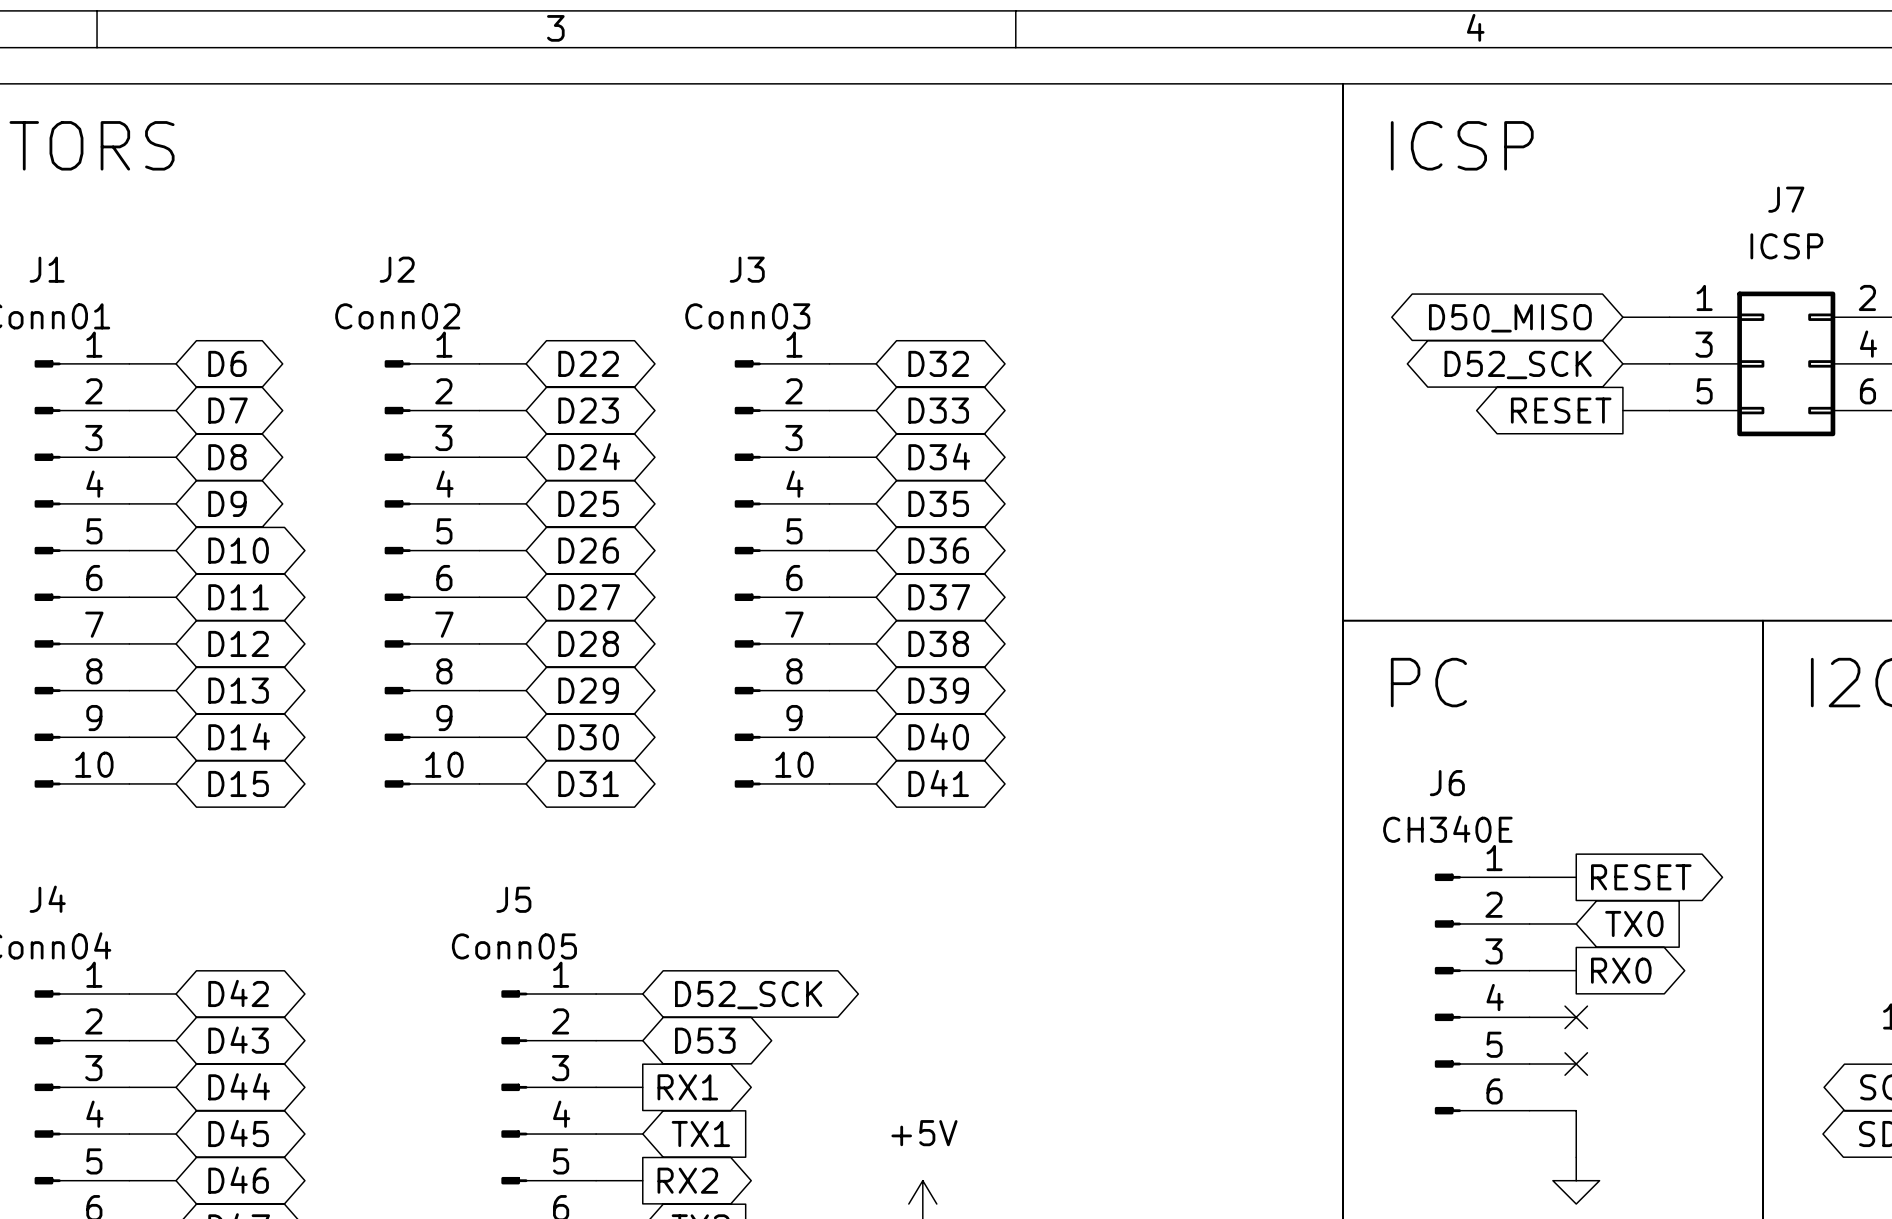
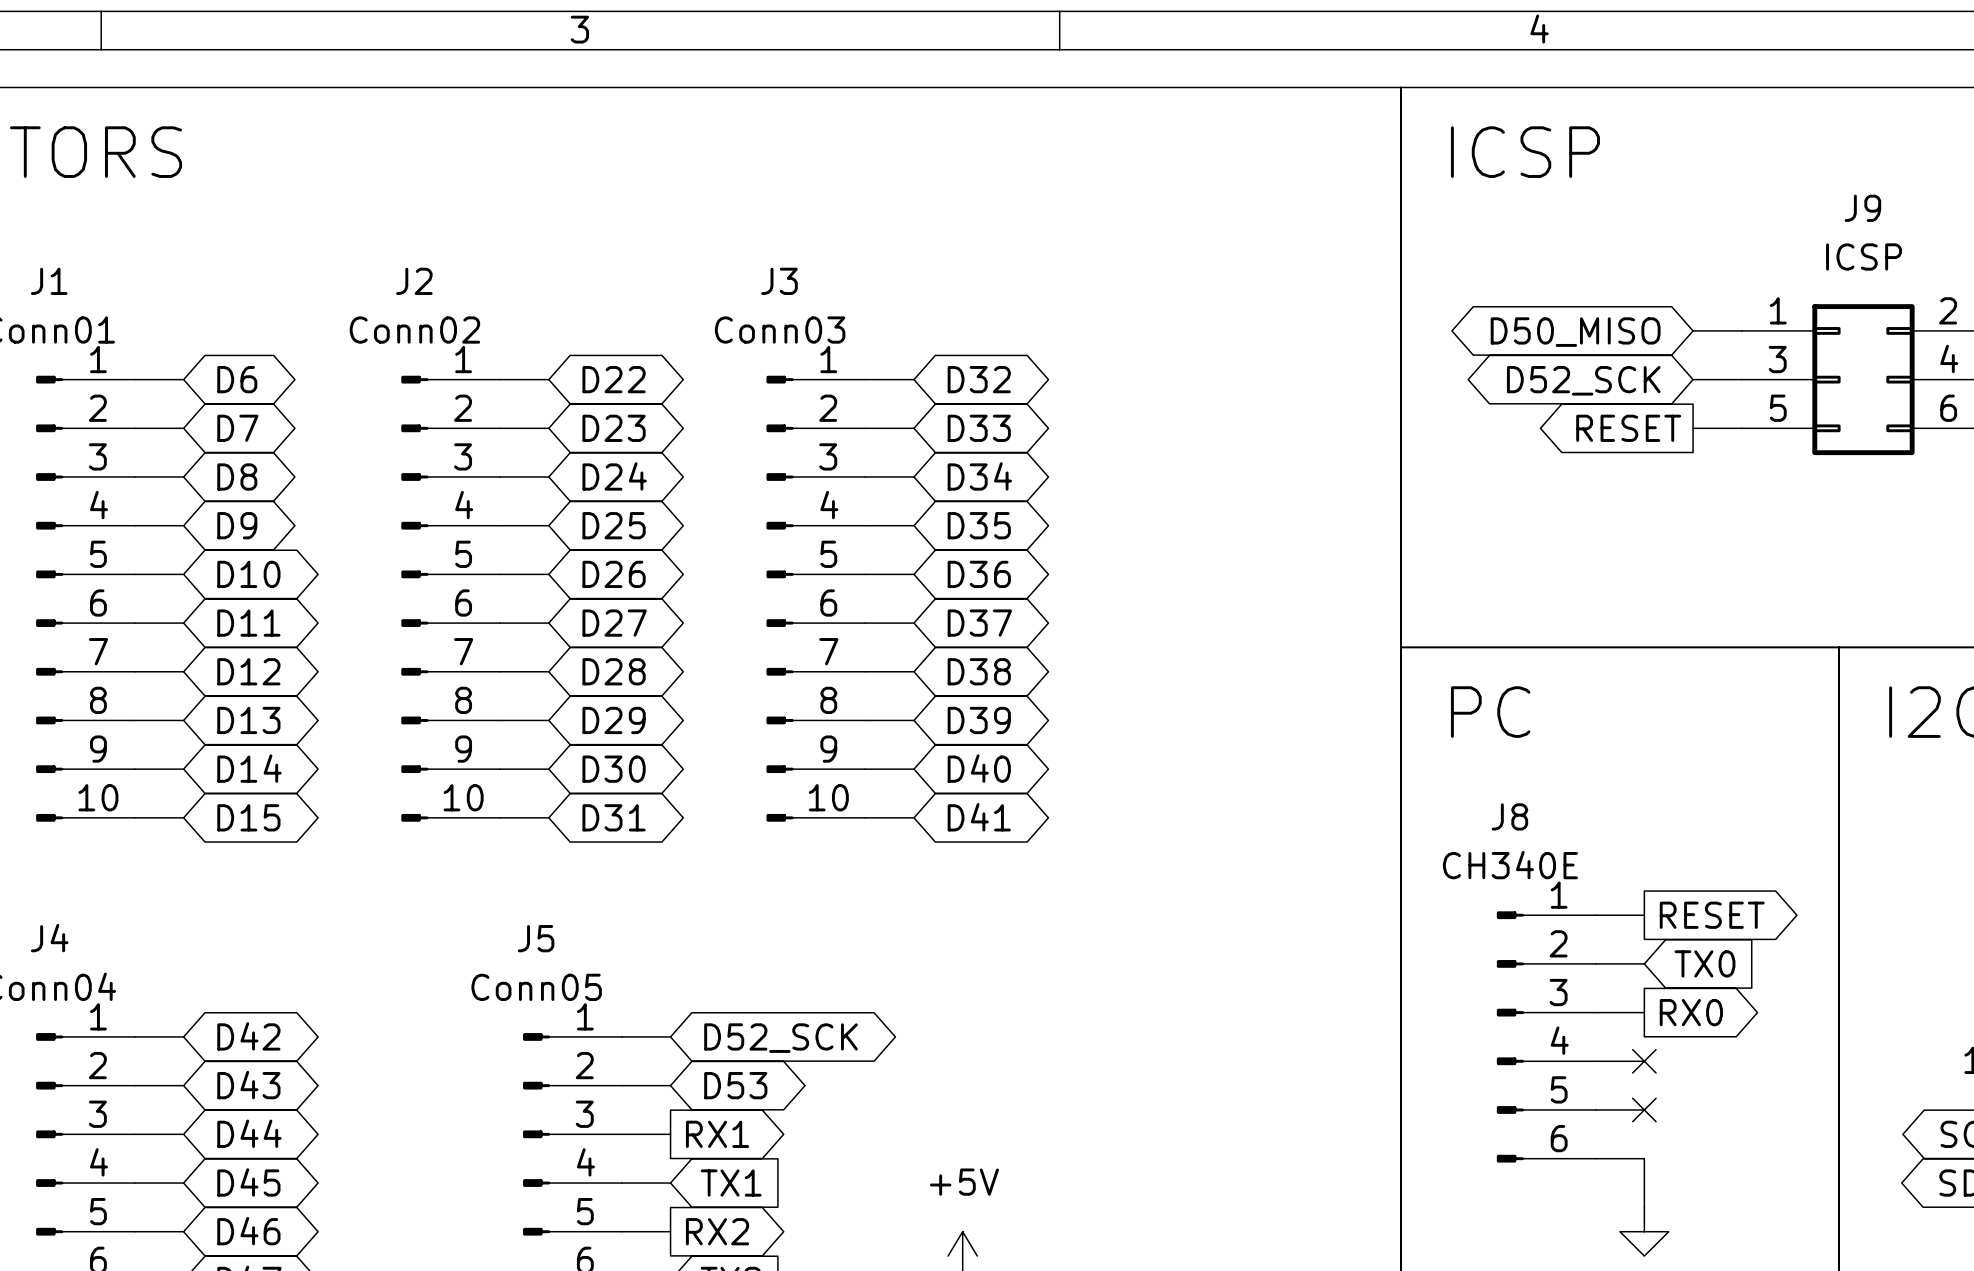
J7 name: J7 (1786, 199) -> J9 (1862, 208)
J6 name: J6 (1447, 783) -> J8 (1509, 816)

